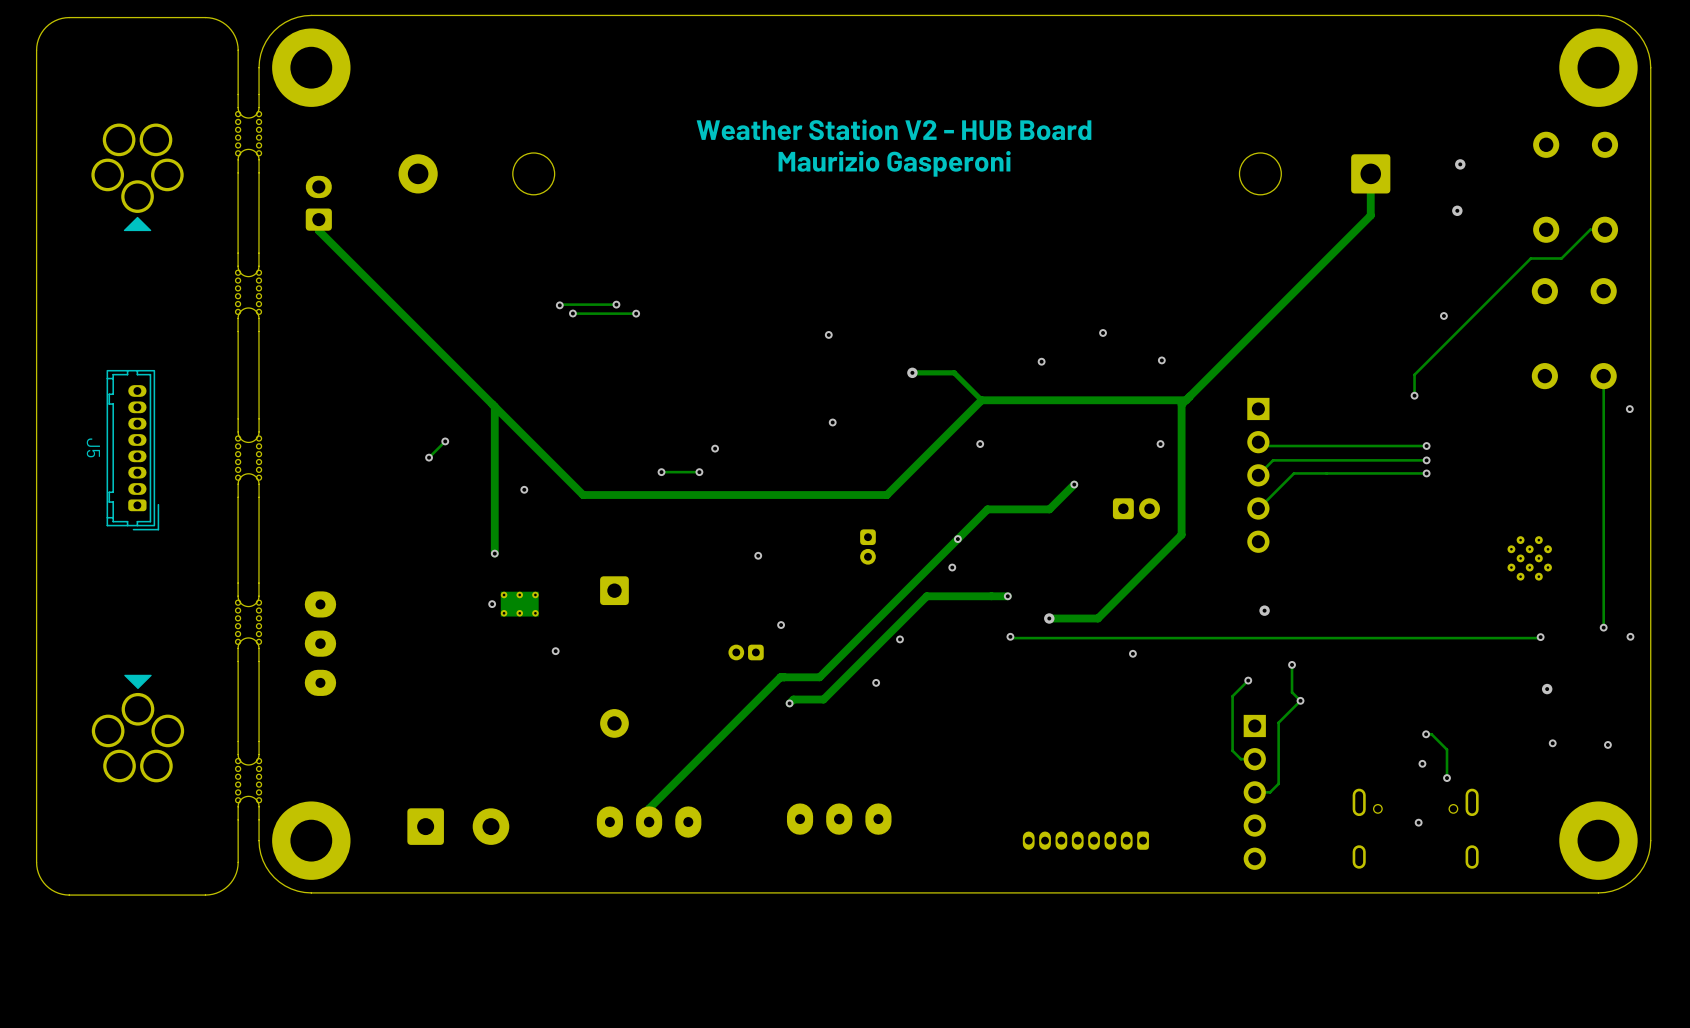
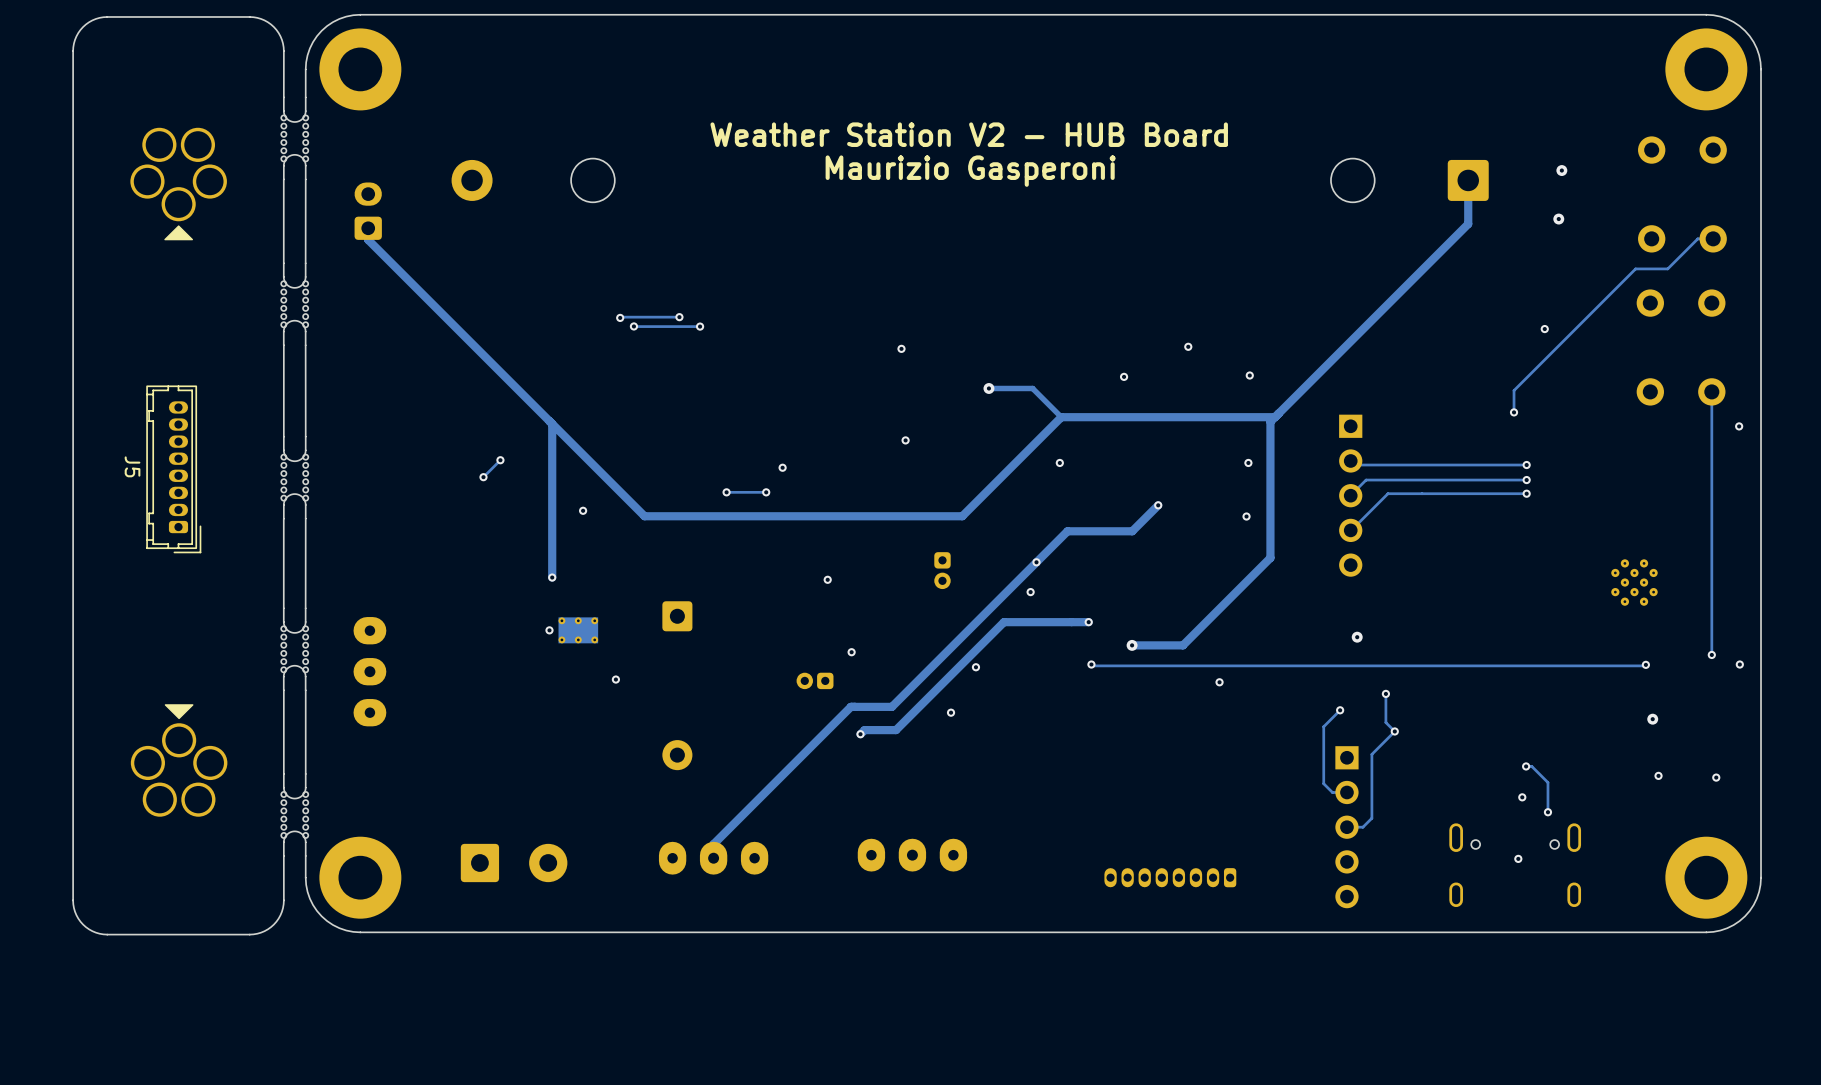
via: none -> (1246, 516)
part: (1136, 508) -> none

